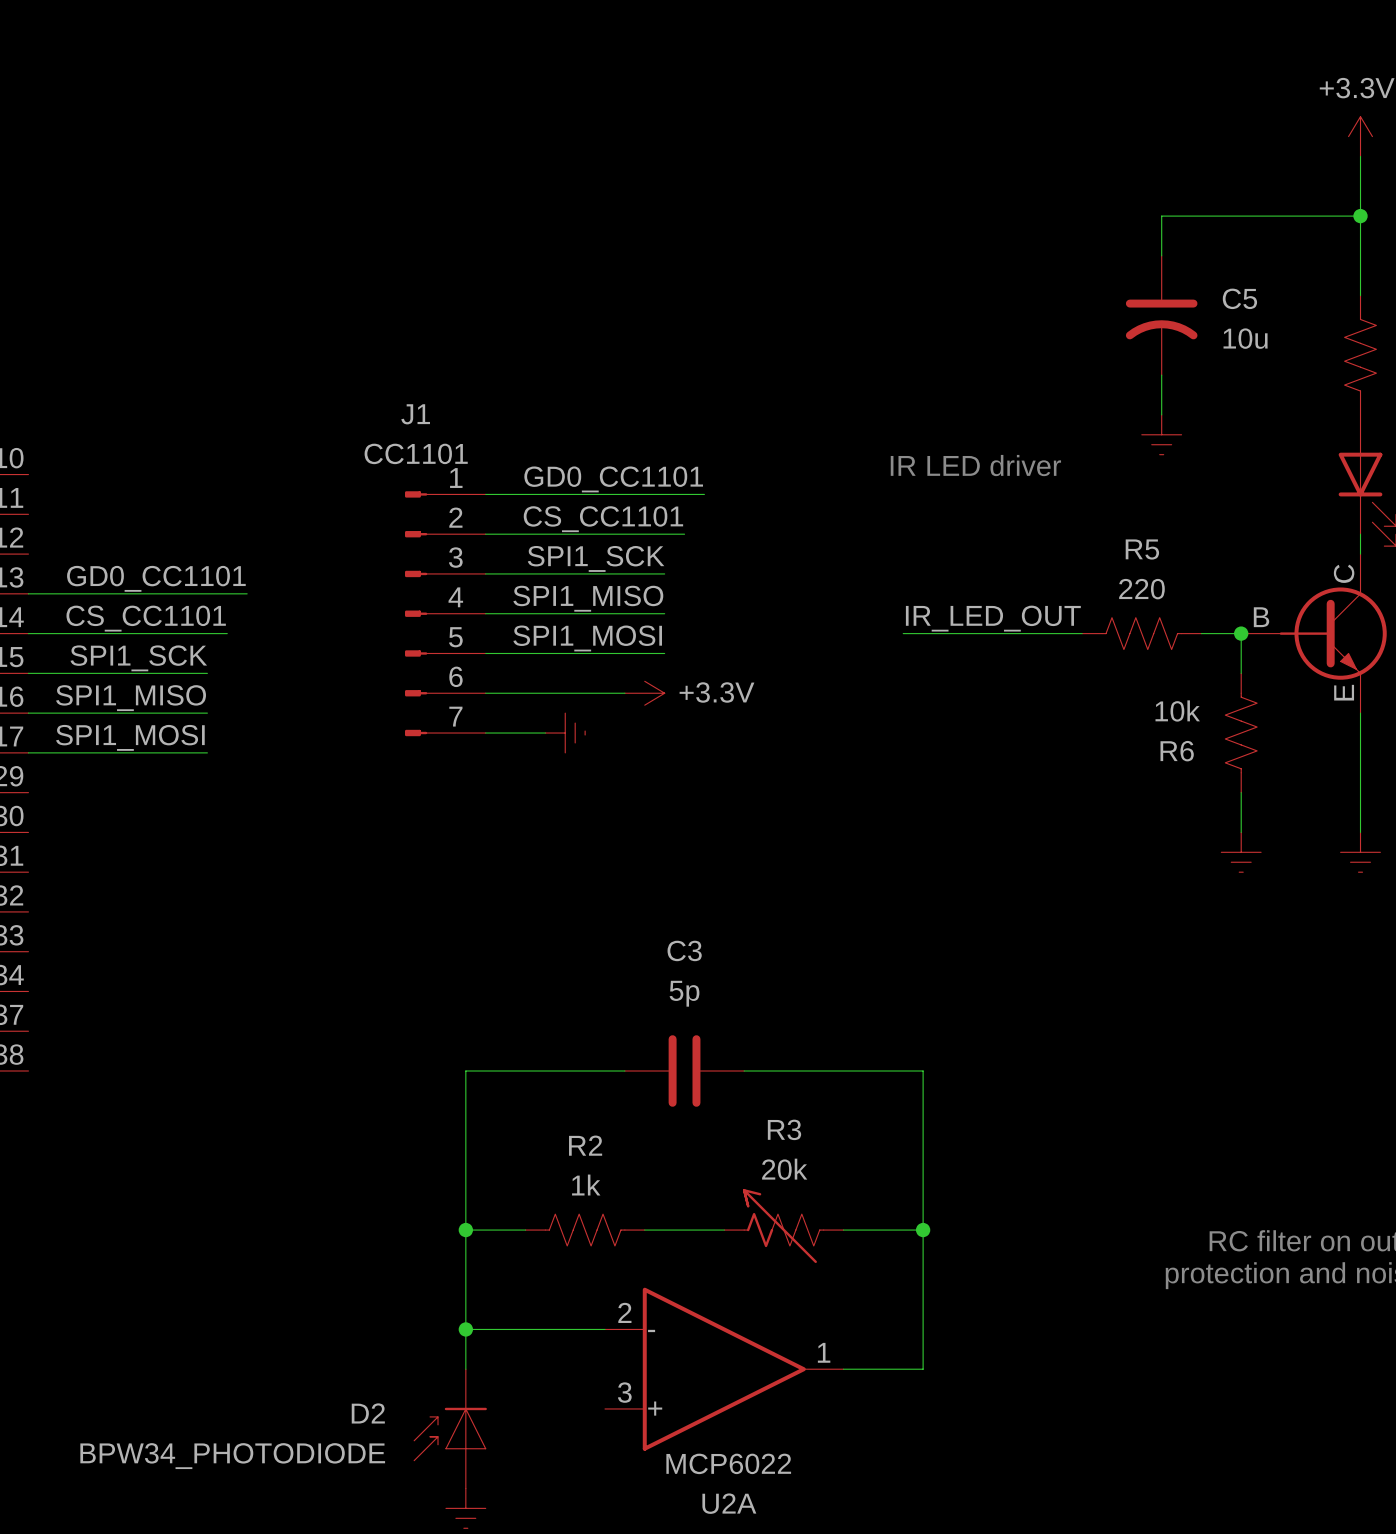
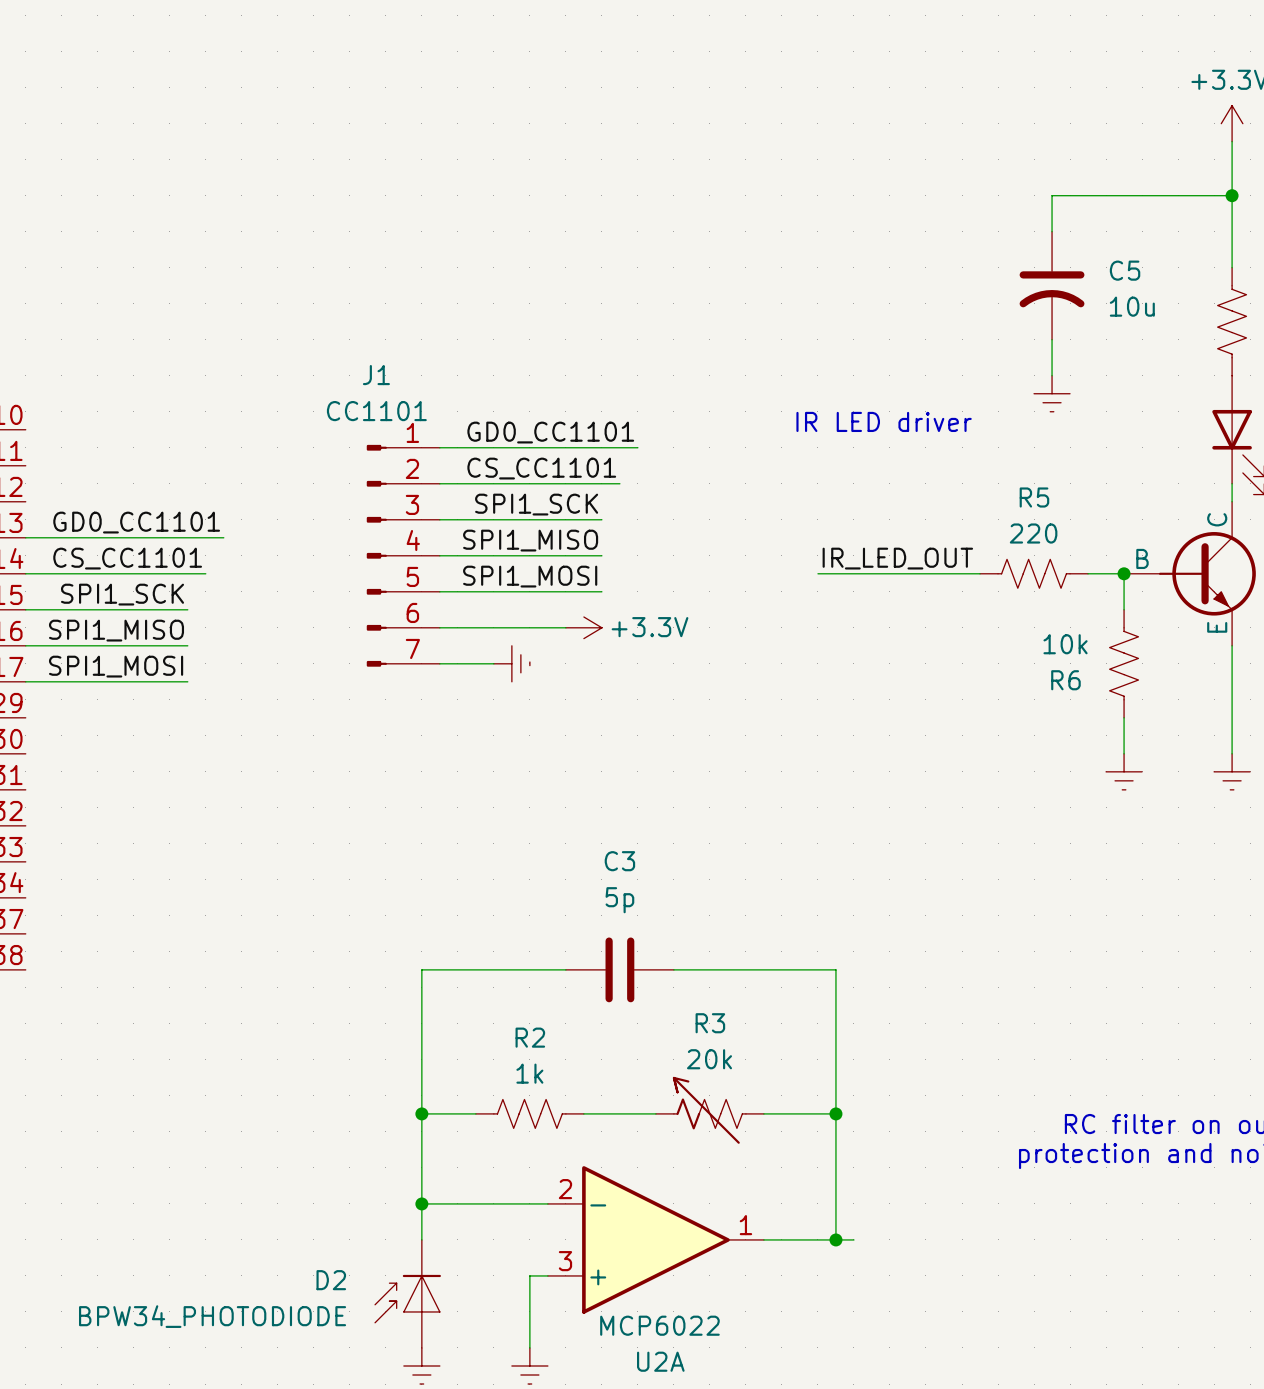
wire: none -> (835, 1239) (853, 1239)
junction: none -> (835, 1239)
wire: none -> (547, 1275) (529, 1275) (529, 1347)
power symbol: none -> (529, 1365)

